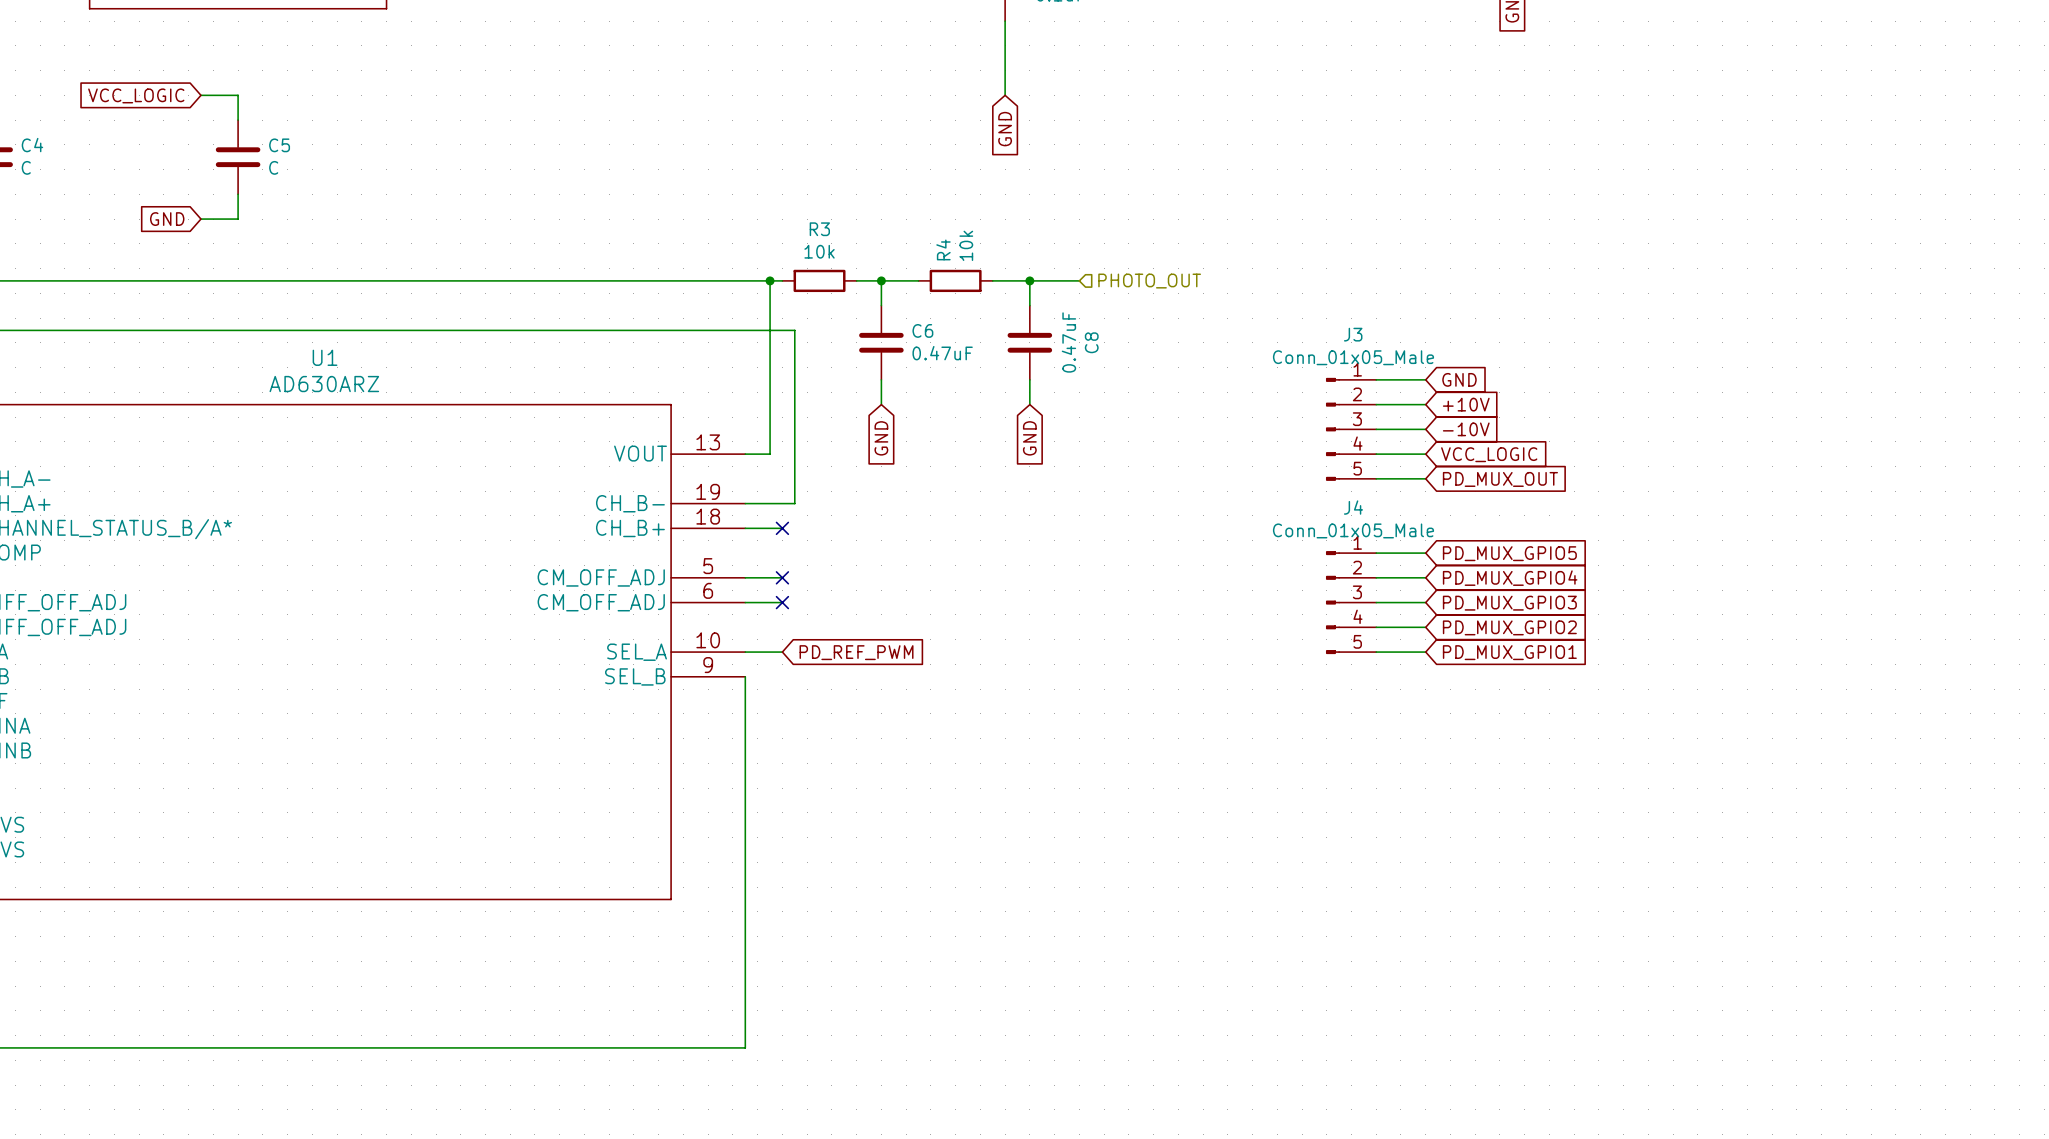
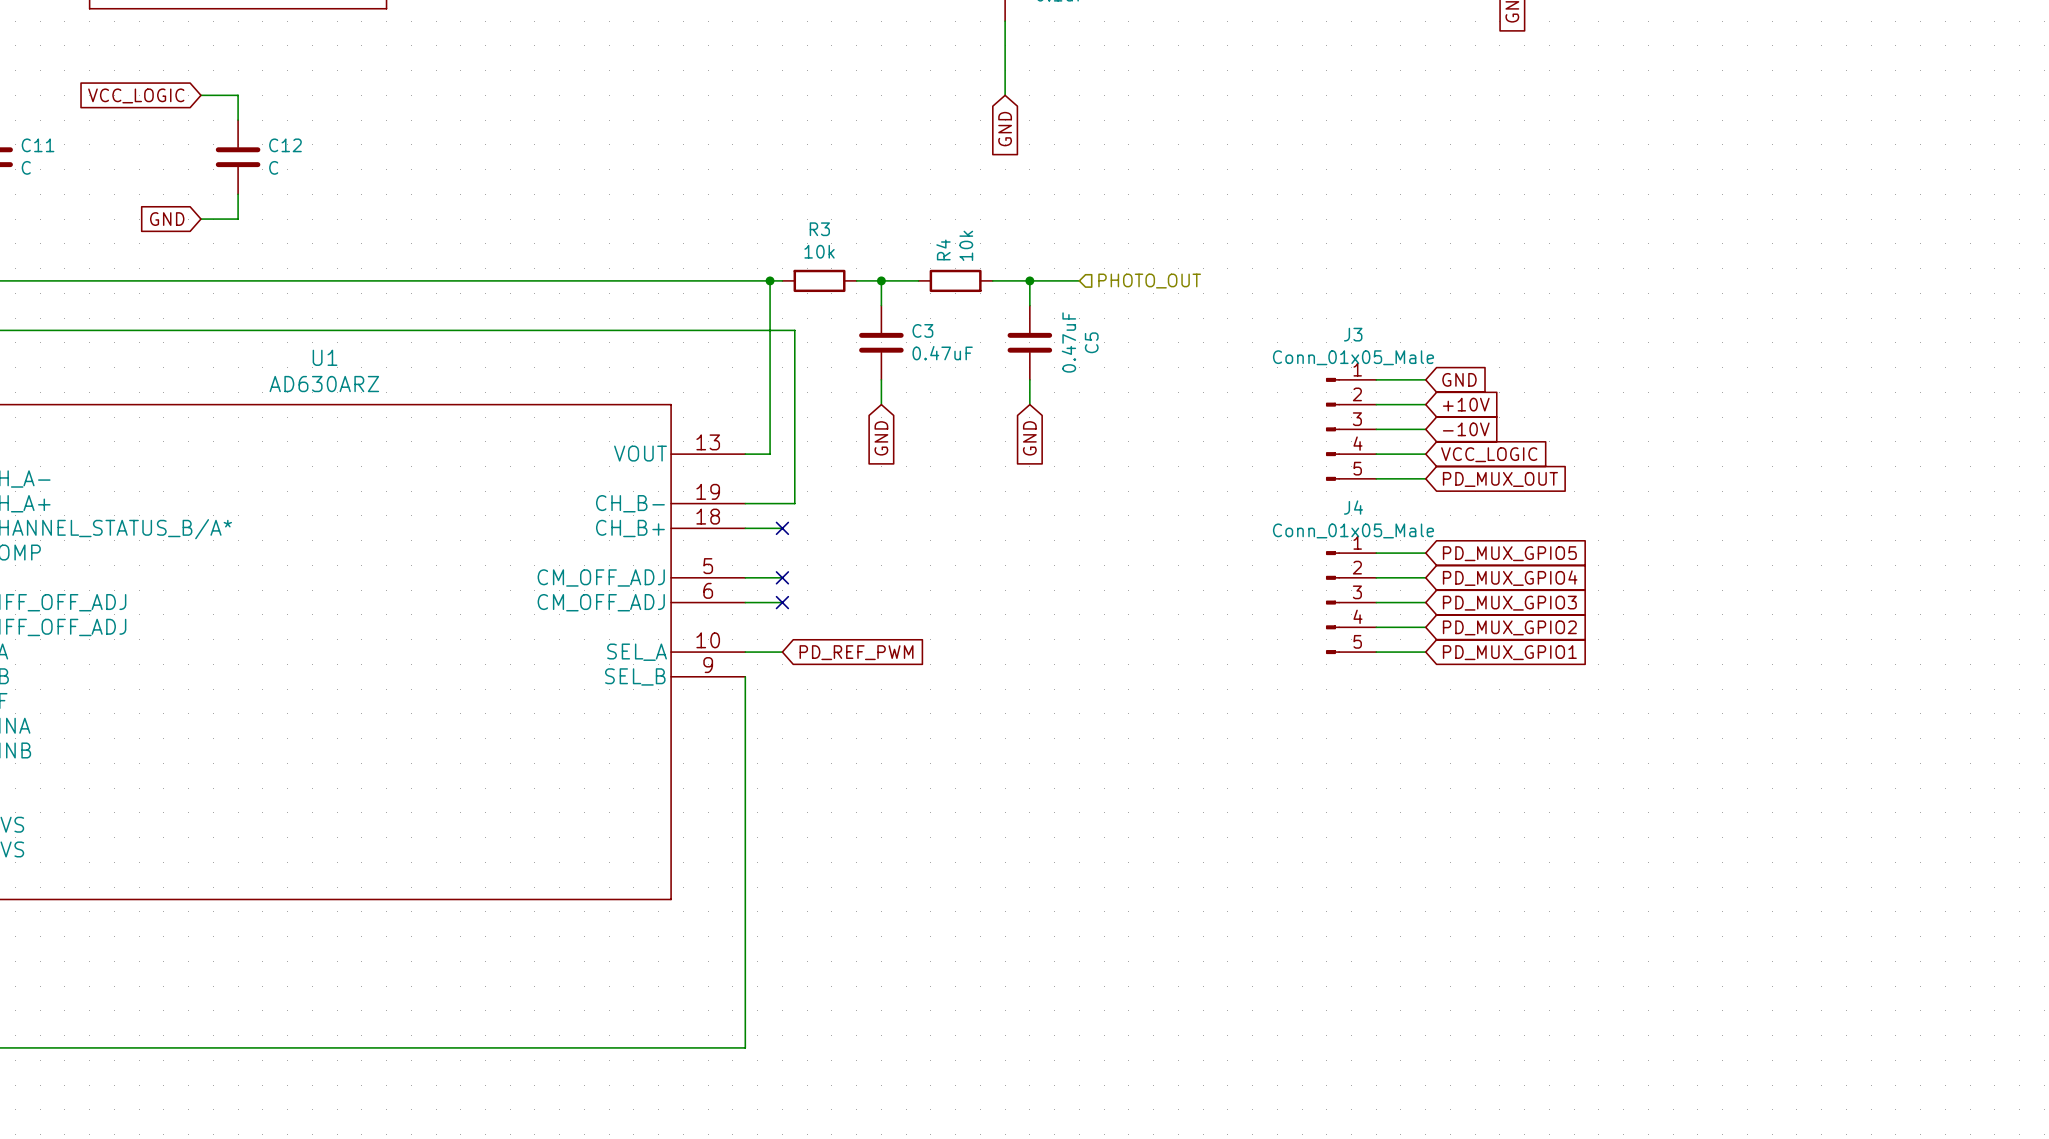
C4 name: C4 (32, 145) -> C11 (38, 145)
C5 name: C5 (279, 145) -> C12 (285, 145)
C6 name: C6 (922, 330) -> C3 (922, 330)
C8 name: C8 (1091, 342) -> C5 (1091, 342)

